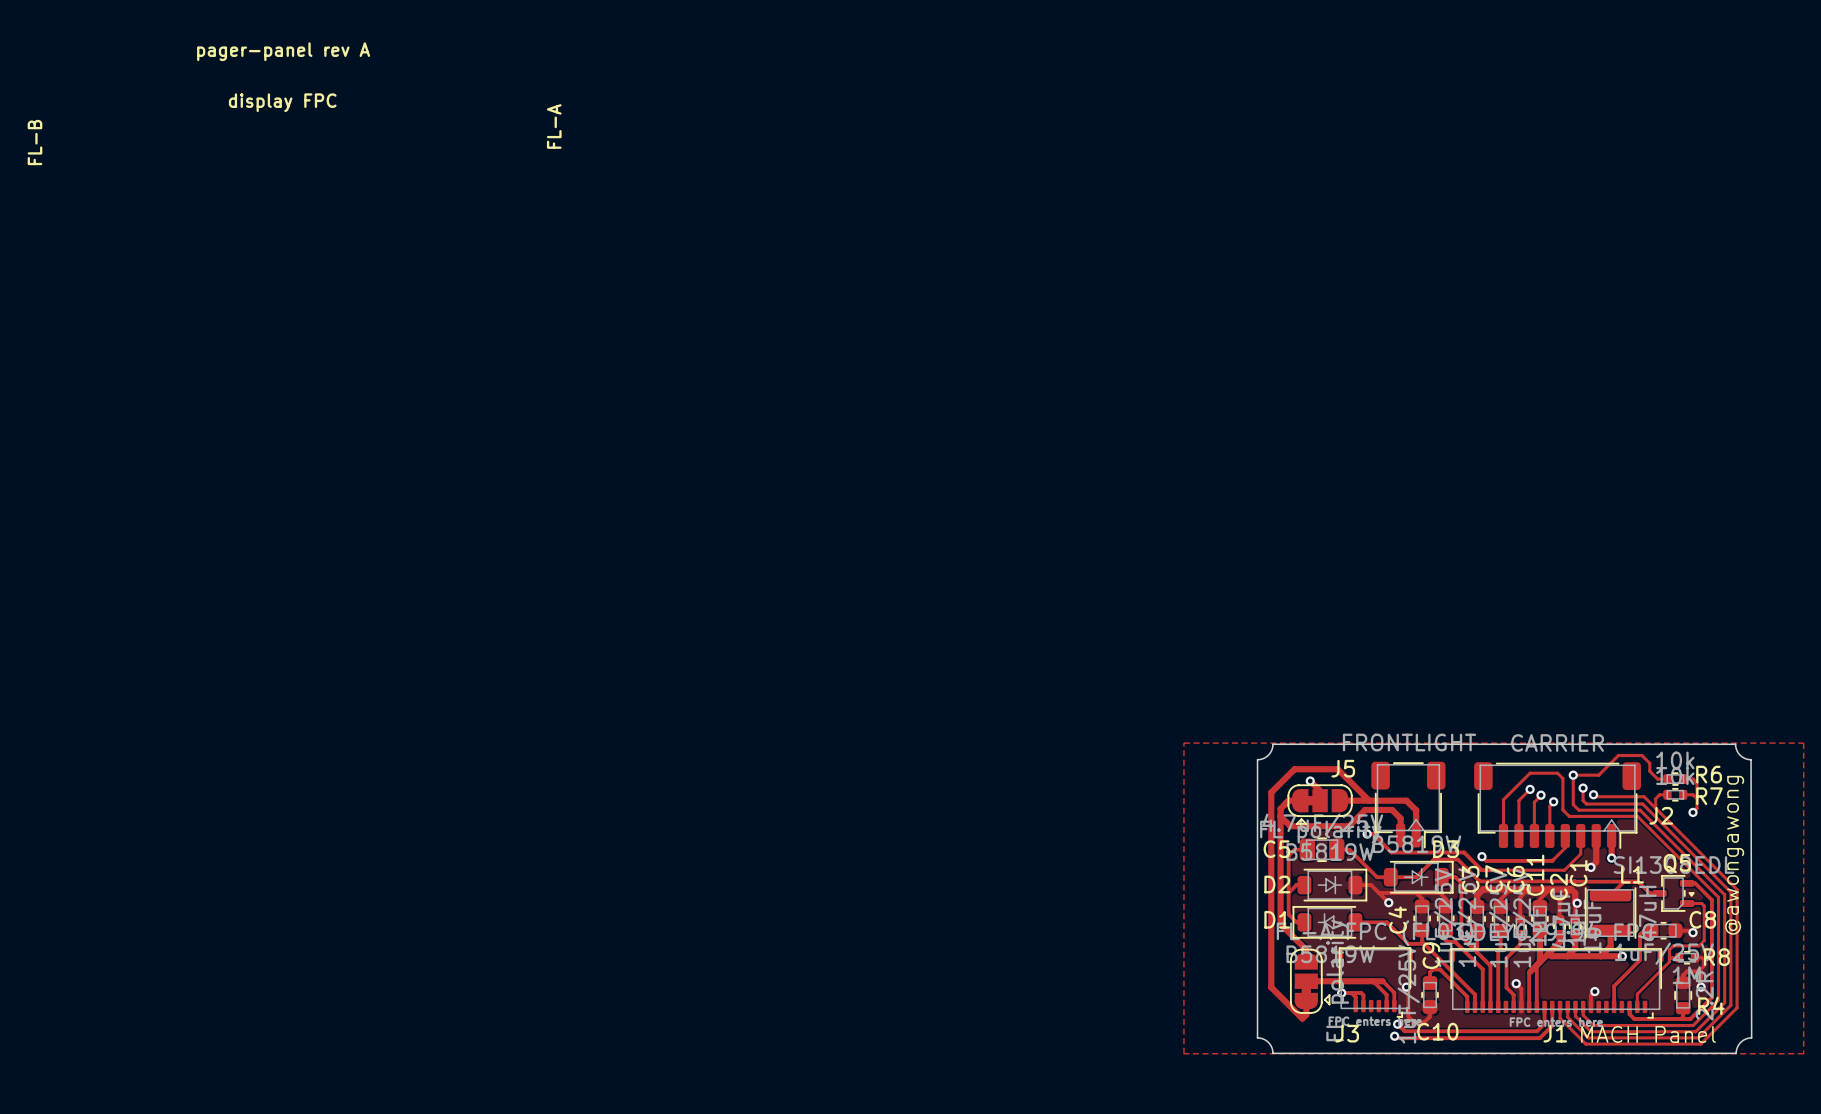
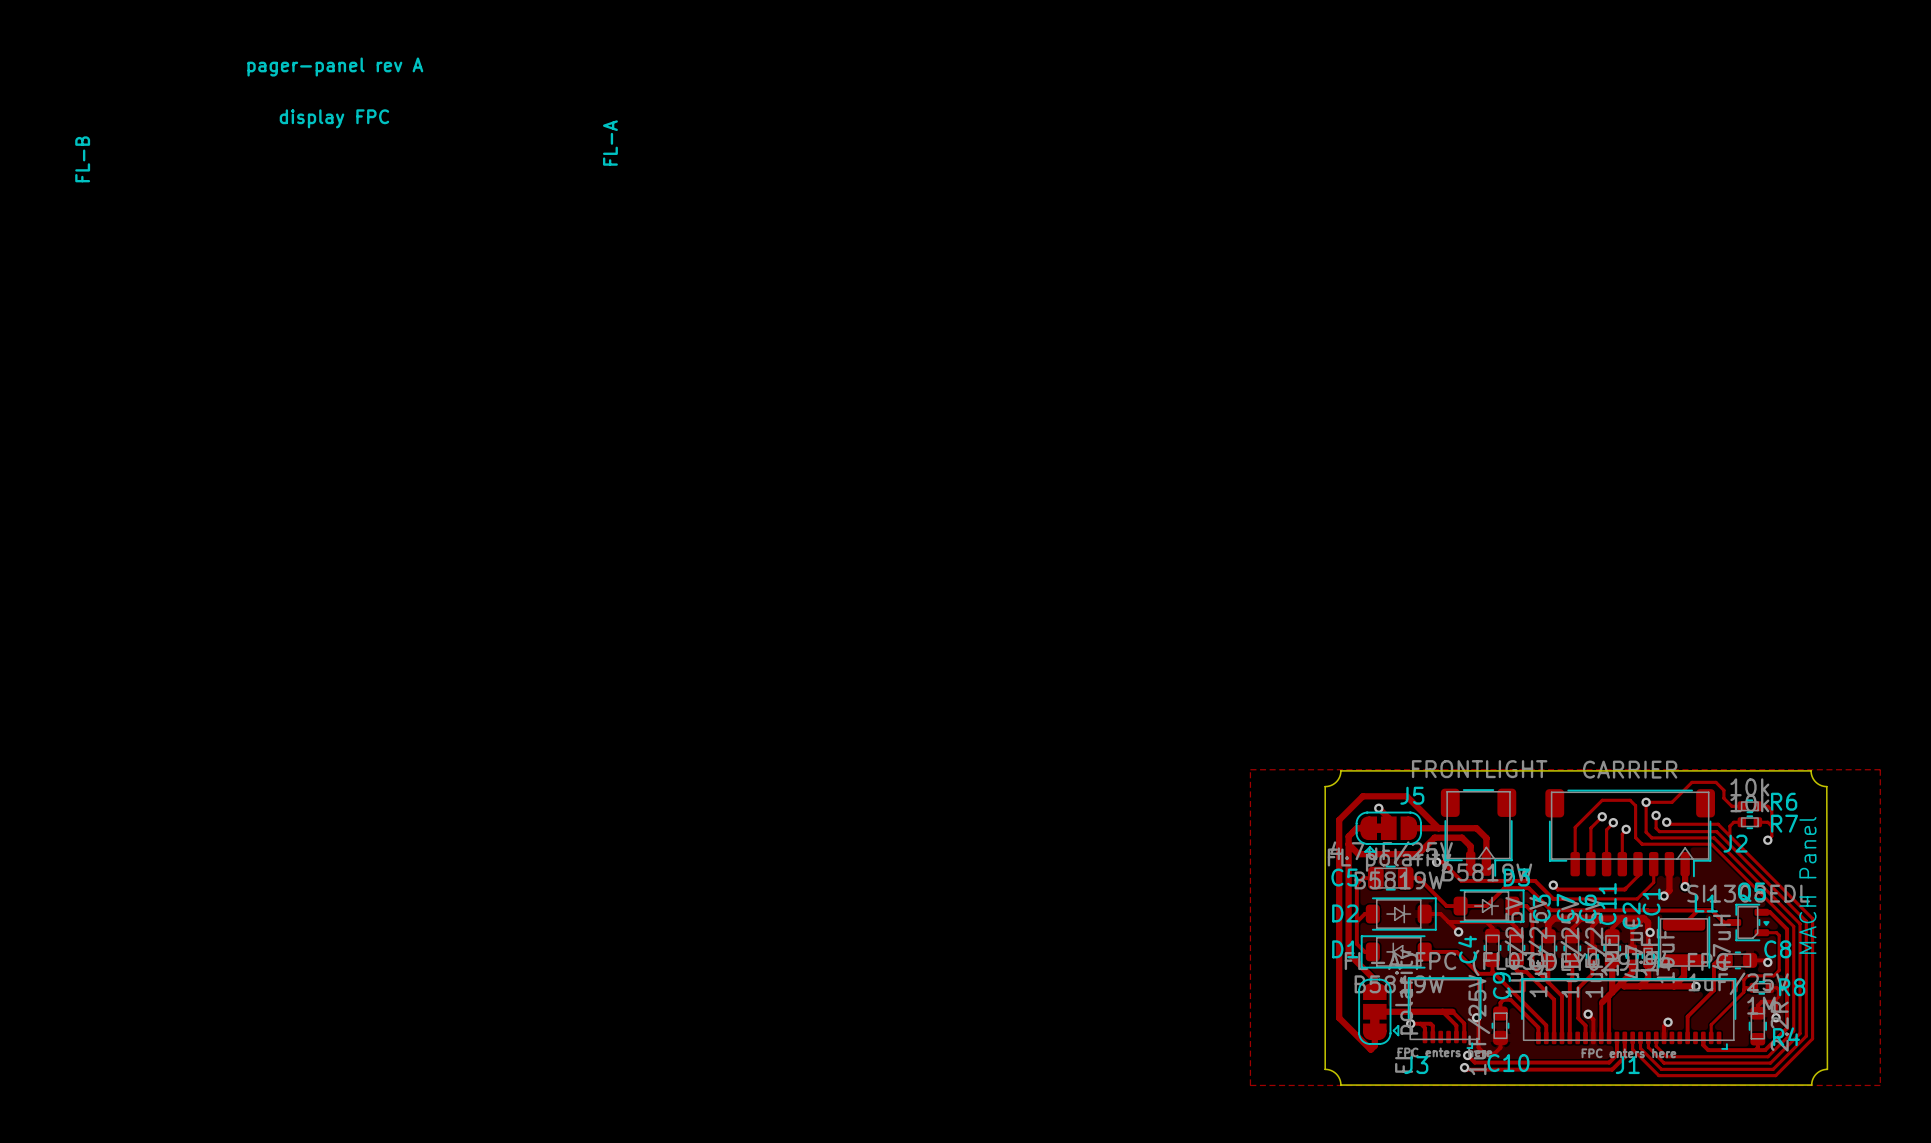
text: @awongawong (1734, 855) -> none
text rotation: 0° (1648, 1034) -> 90° counterclockwise (1807, 885)
text position: MACH Panel (1648, 1034) -> MACH Panel (1807, 885)

